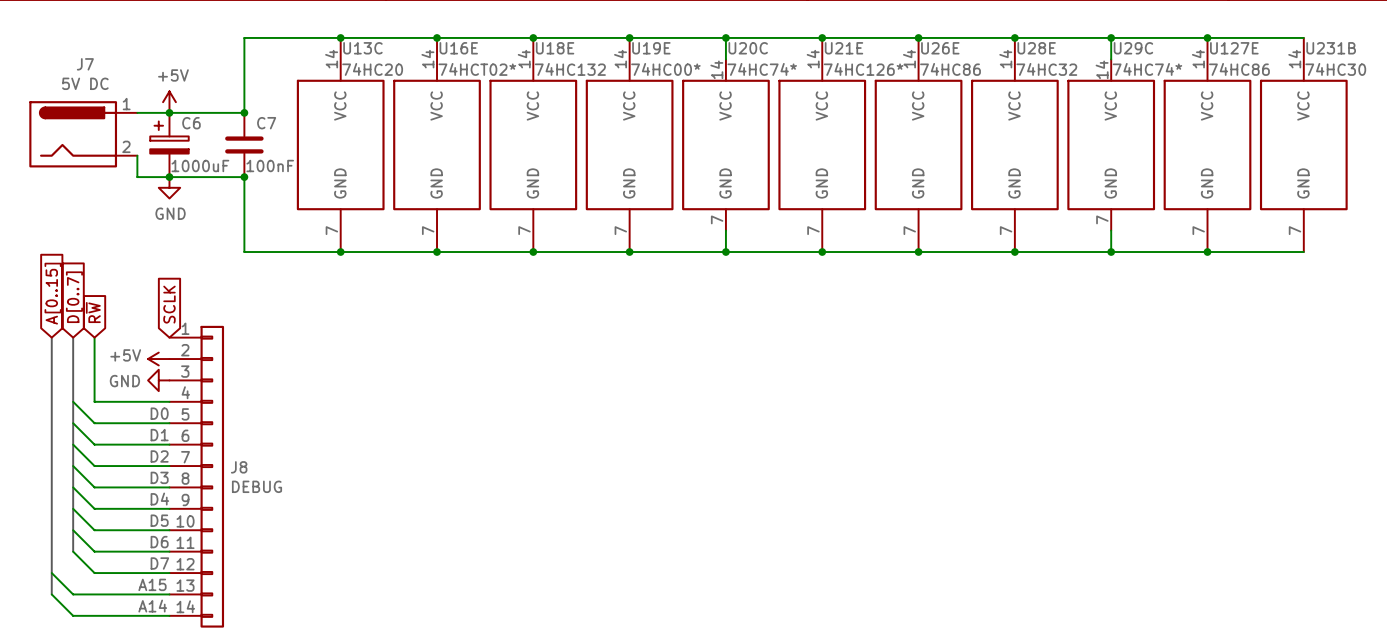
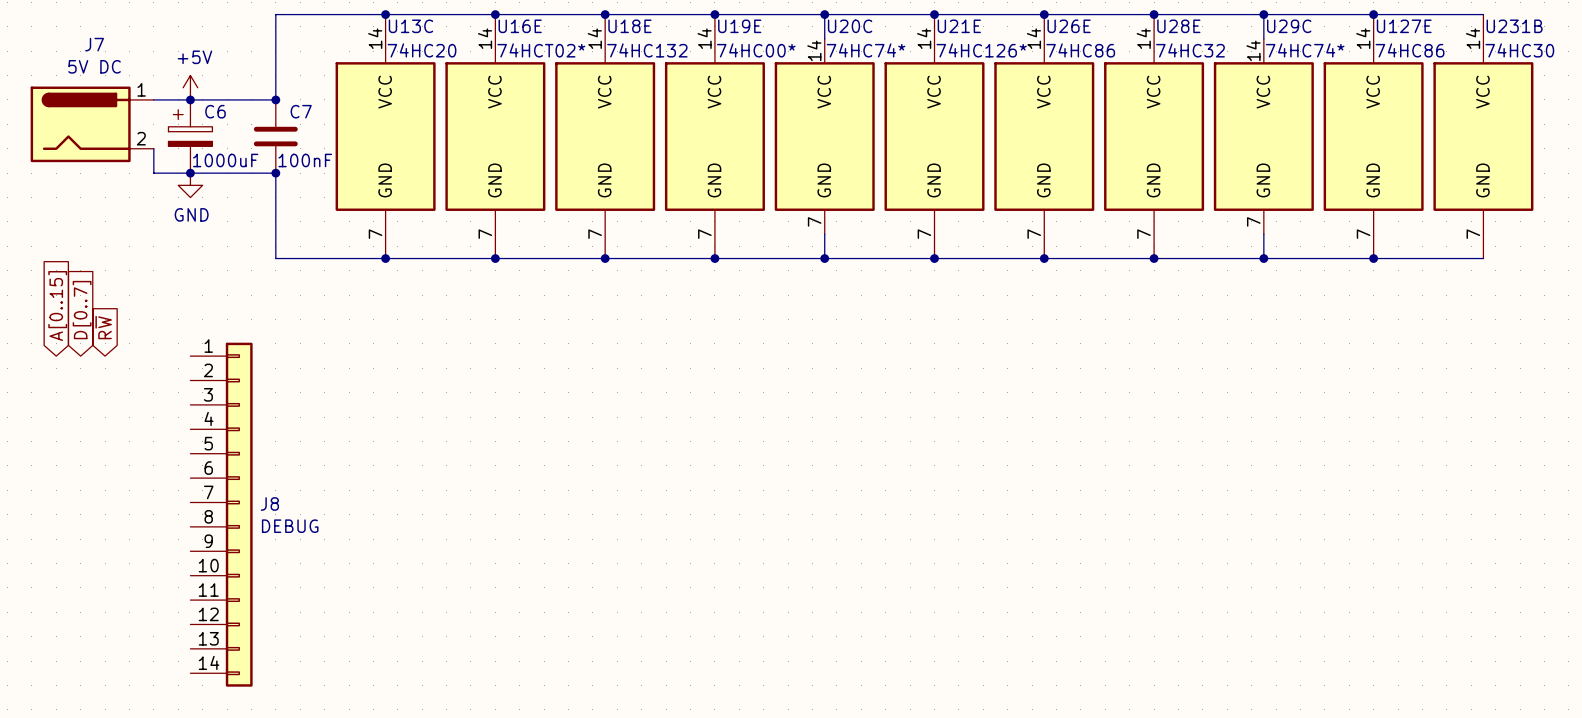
global label: SCLK (169, 304) -> none
bus: (51, 337) (51, 594) -> none
bus: (73, 337) (73, 551) -> none
wire: (94, 337) (94, 401) (169, 401) -> none
power symbol: +5V (158, 359) -> none
power symbol: GND (158, 380) -> none
wire: (73, 401) (94, 423) (169, 423) -> none
label: D0 (159, 413) -> none
wire: (73, 423) (94, 444) (169, 444) -> none
label: D1 (159, 435) -> none
wire: (73, 444) (94, 466) (169, 466) -> none
label: D2 (159, 456) -> none
wire: (73, 466) (94, 487) (169, 487) -> none
label: D3 (159, 477) -> none
wire: (73, 487) (94, 508) (169, 508) -> none
label: D4 (159, 499) -> none
wire: (73, 508) (94, 530) (169, 530) -> none
label: D5 (159, 520) -> none
wire: (73, 530) (94, 551) (169, 551) -> none
label: D6 (159, 542) -> none
wire: (73, 551) (94, 573) (169, 573) -> none
label: D7 (159, 563) -> none
wire: (51, 573) (73, 594) (169, 594) -> none
label: A15 (152, 584) -> none
wire: (51, 594) (73, 615) (169, 615) -> none
label: A14 (152, 606) -> none

